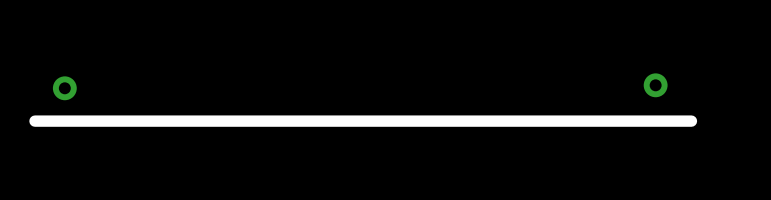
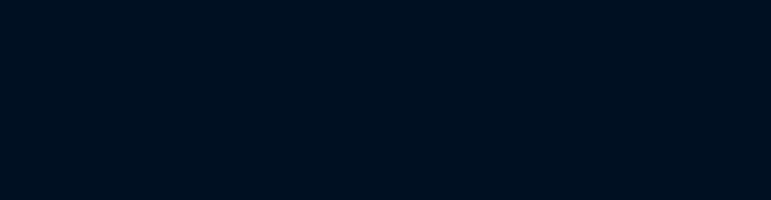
via: (655, 85) -> none
via: (64, 88) -> none
board edge: (34, 121) (691, 121) -> none

